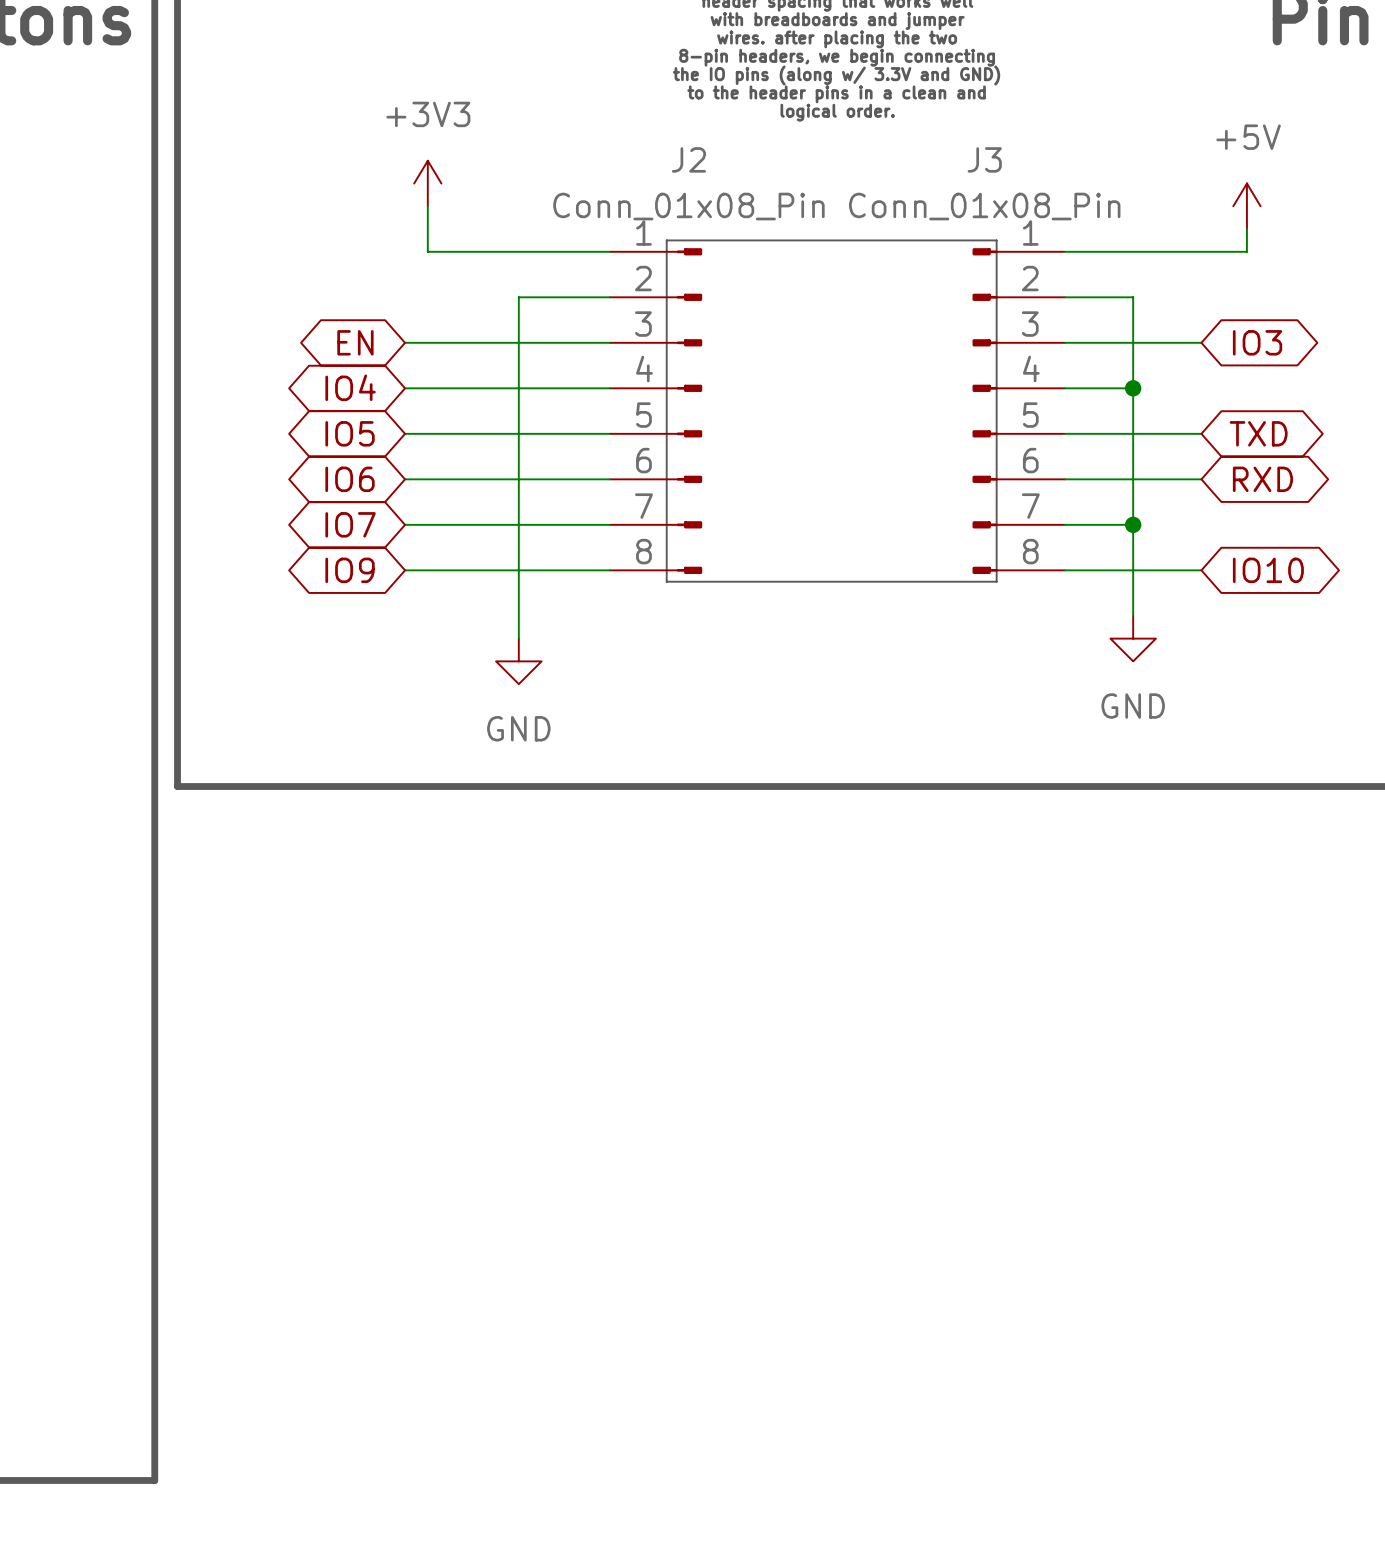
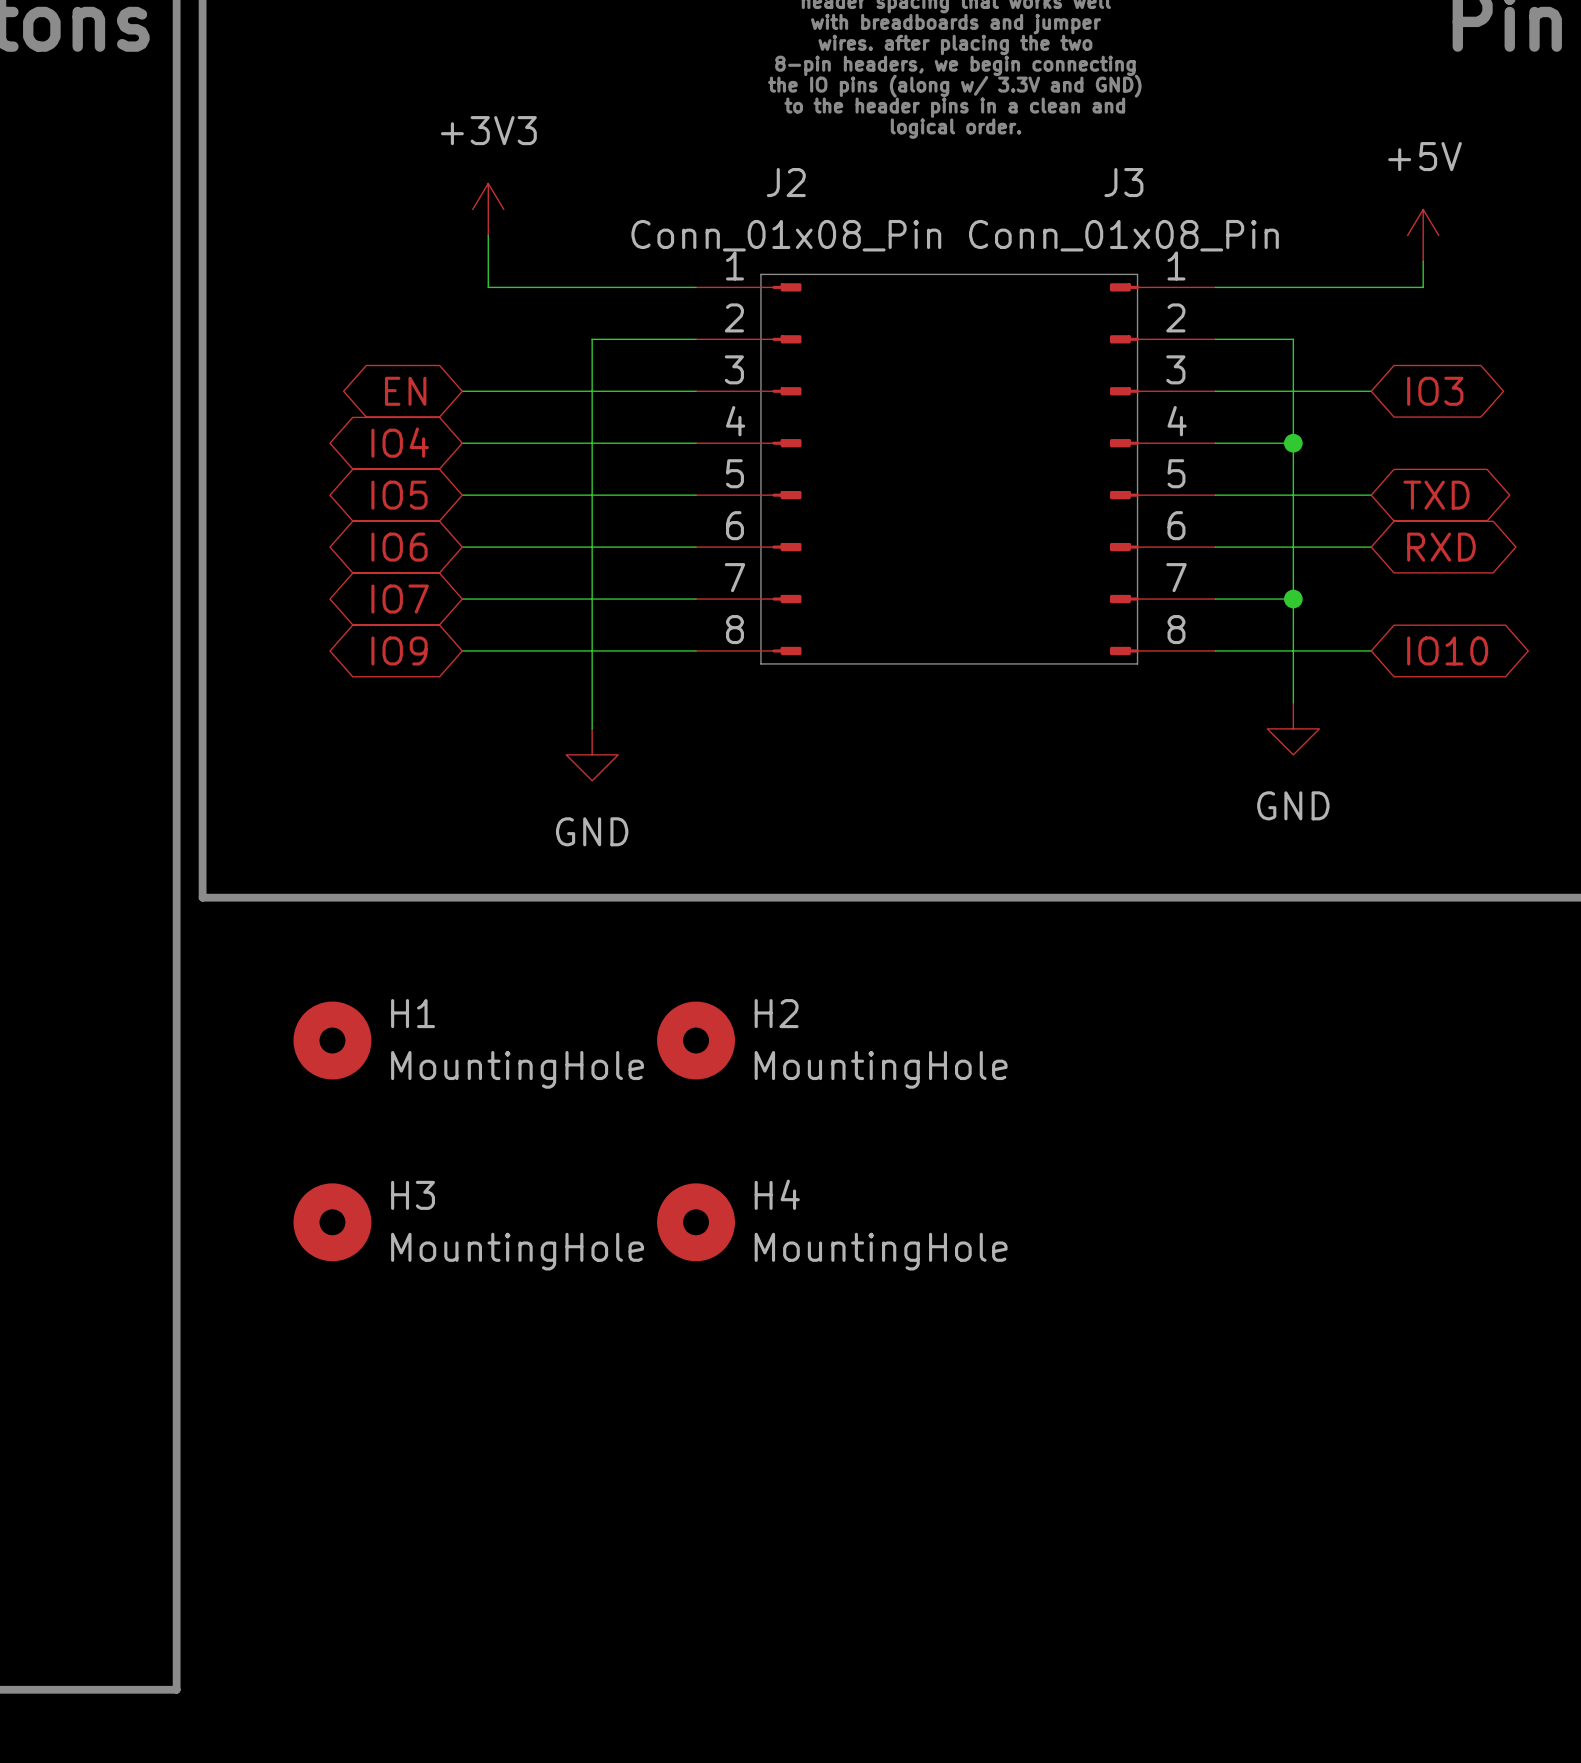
H1: none -> MountingHole (332, 1040)
H2: none -> MountingHole (696, 1040)
H3: none -> MountingHole (332, 1222)
H4: none -> MountingHole (696, 1222)

